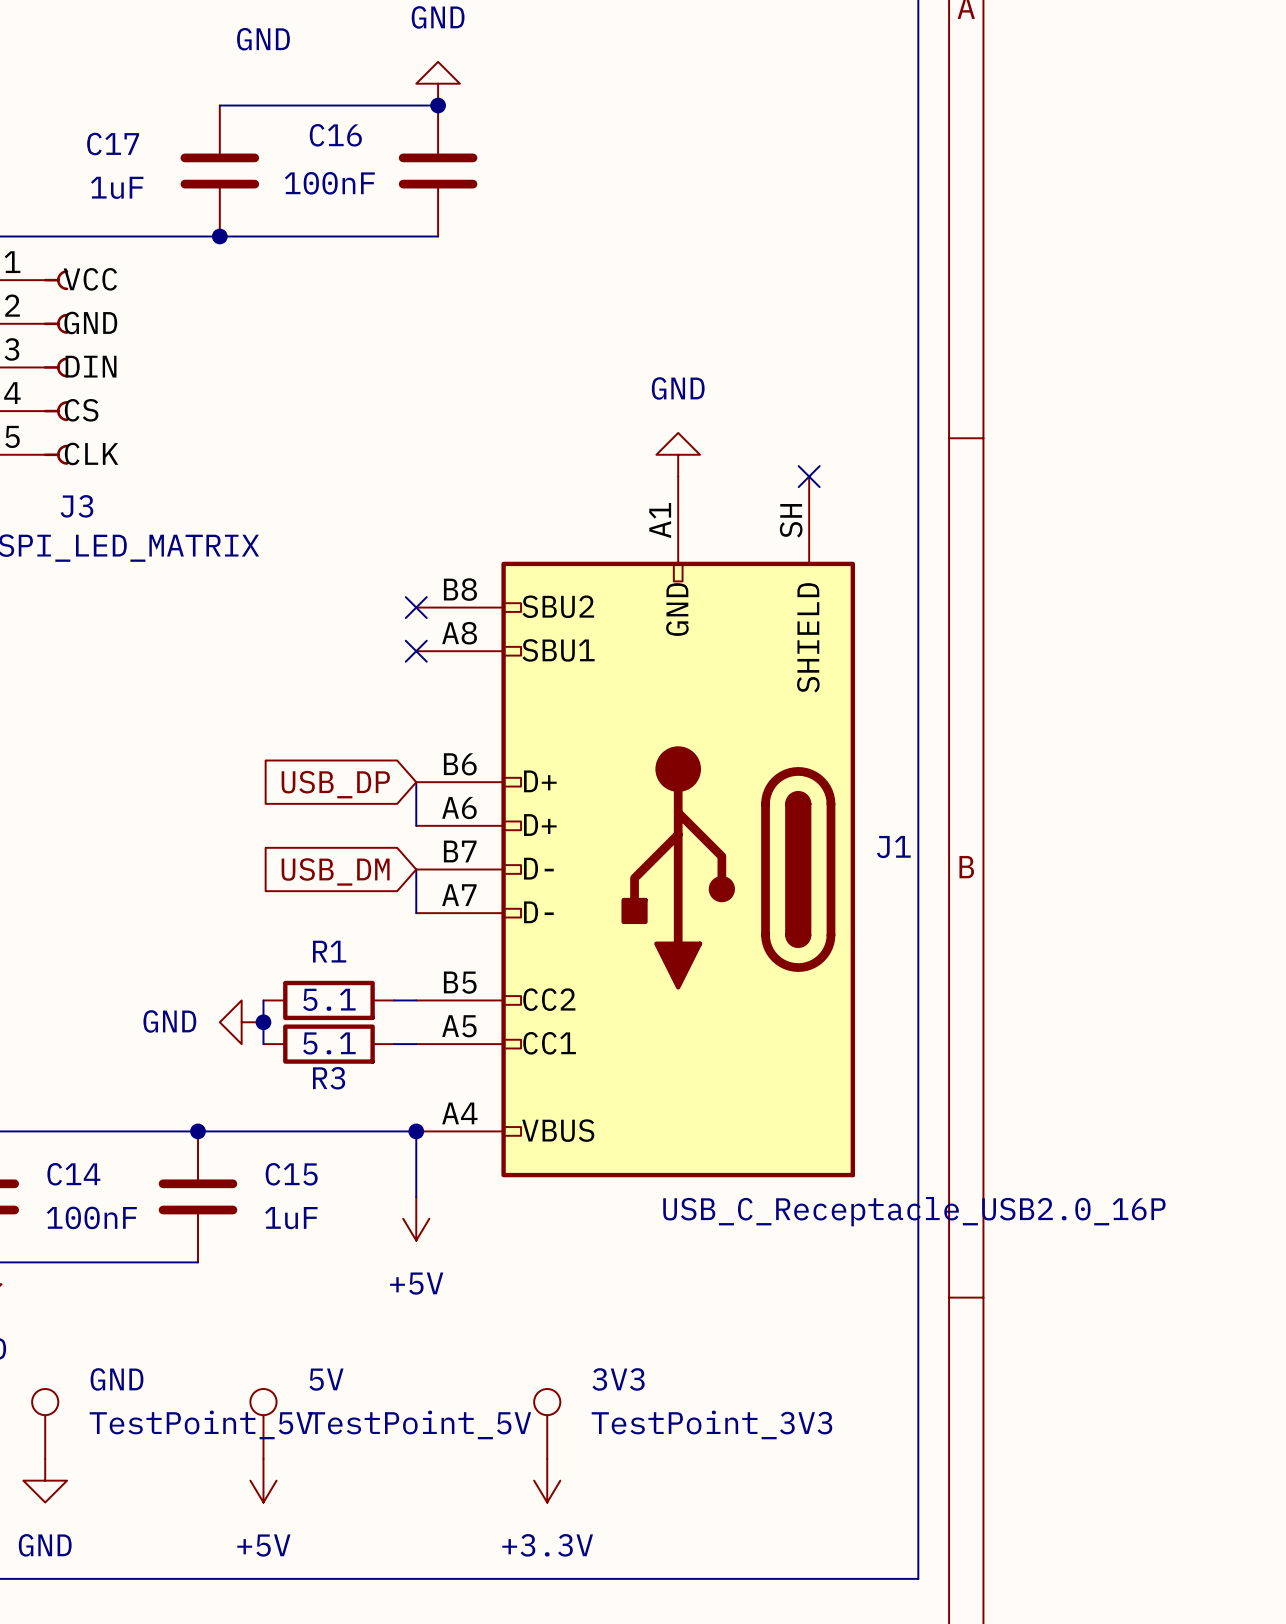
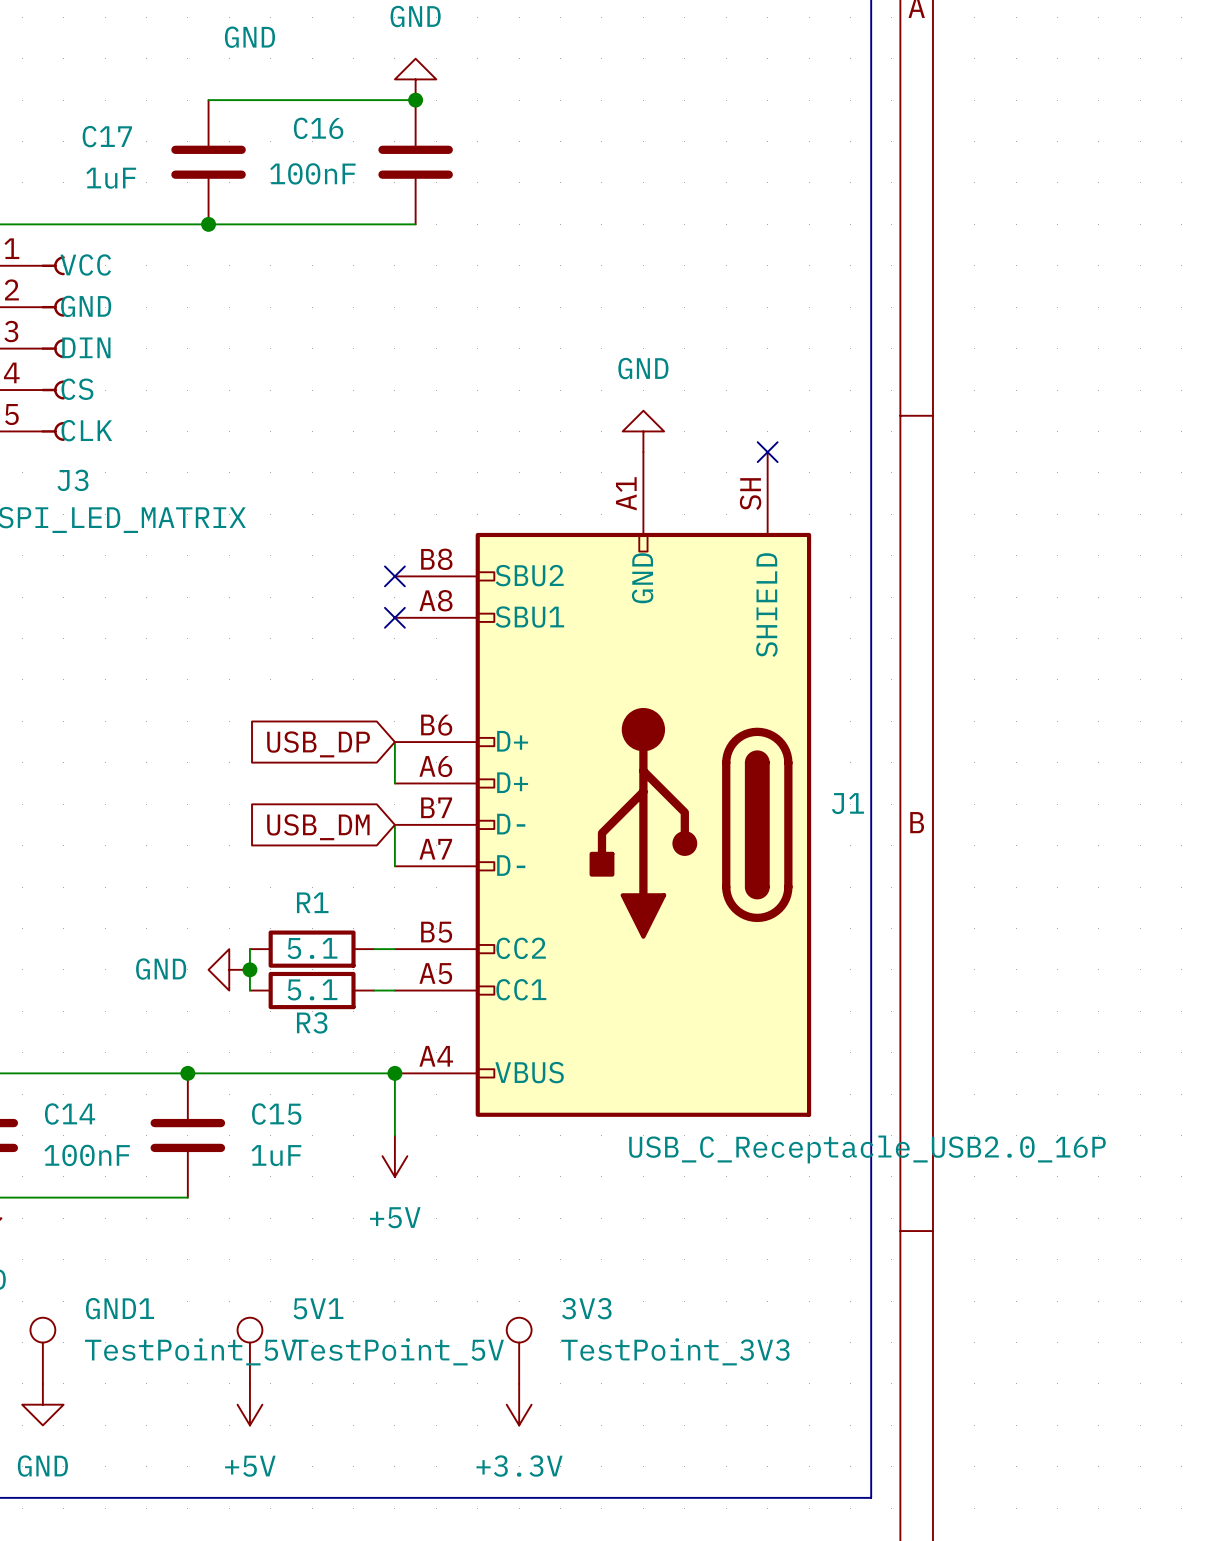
GND name: GND (117, 1379) -> GND1 (120, 1308)
5V name: 5V (326, 1379) -> 5V1 (318, 1308)

